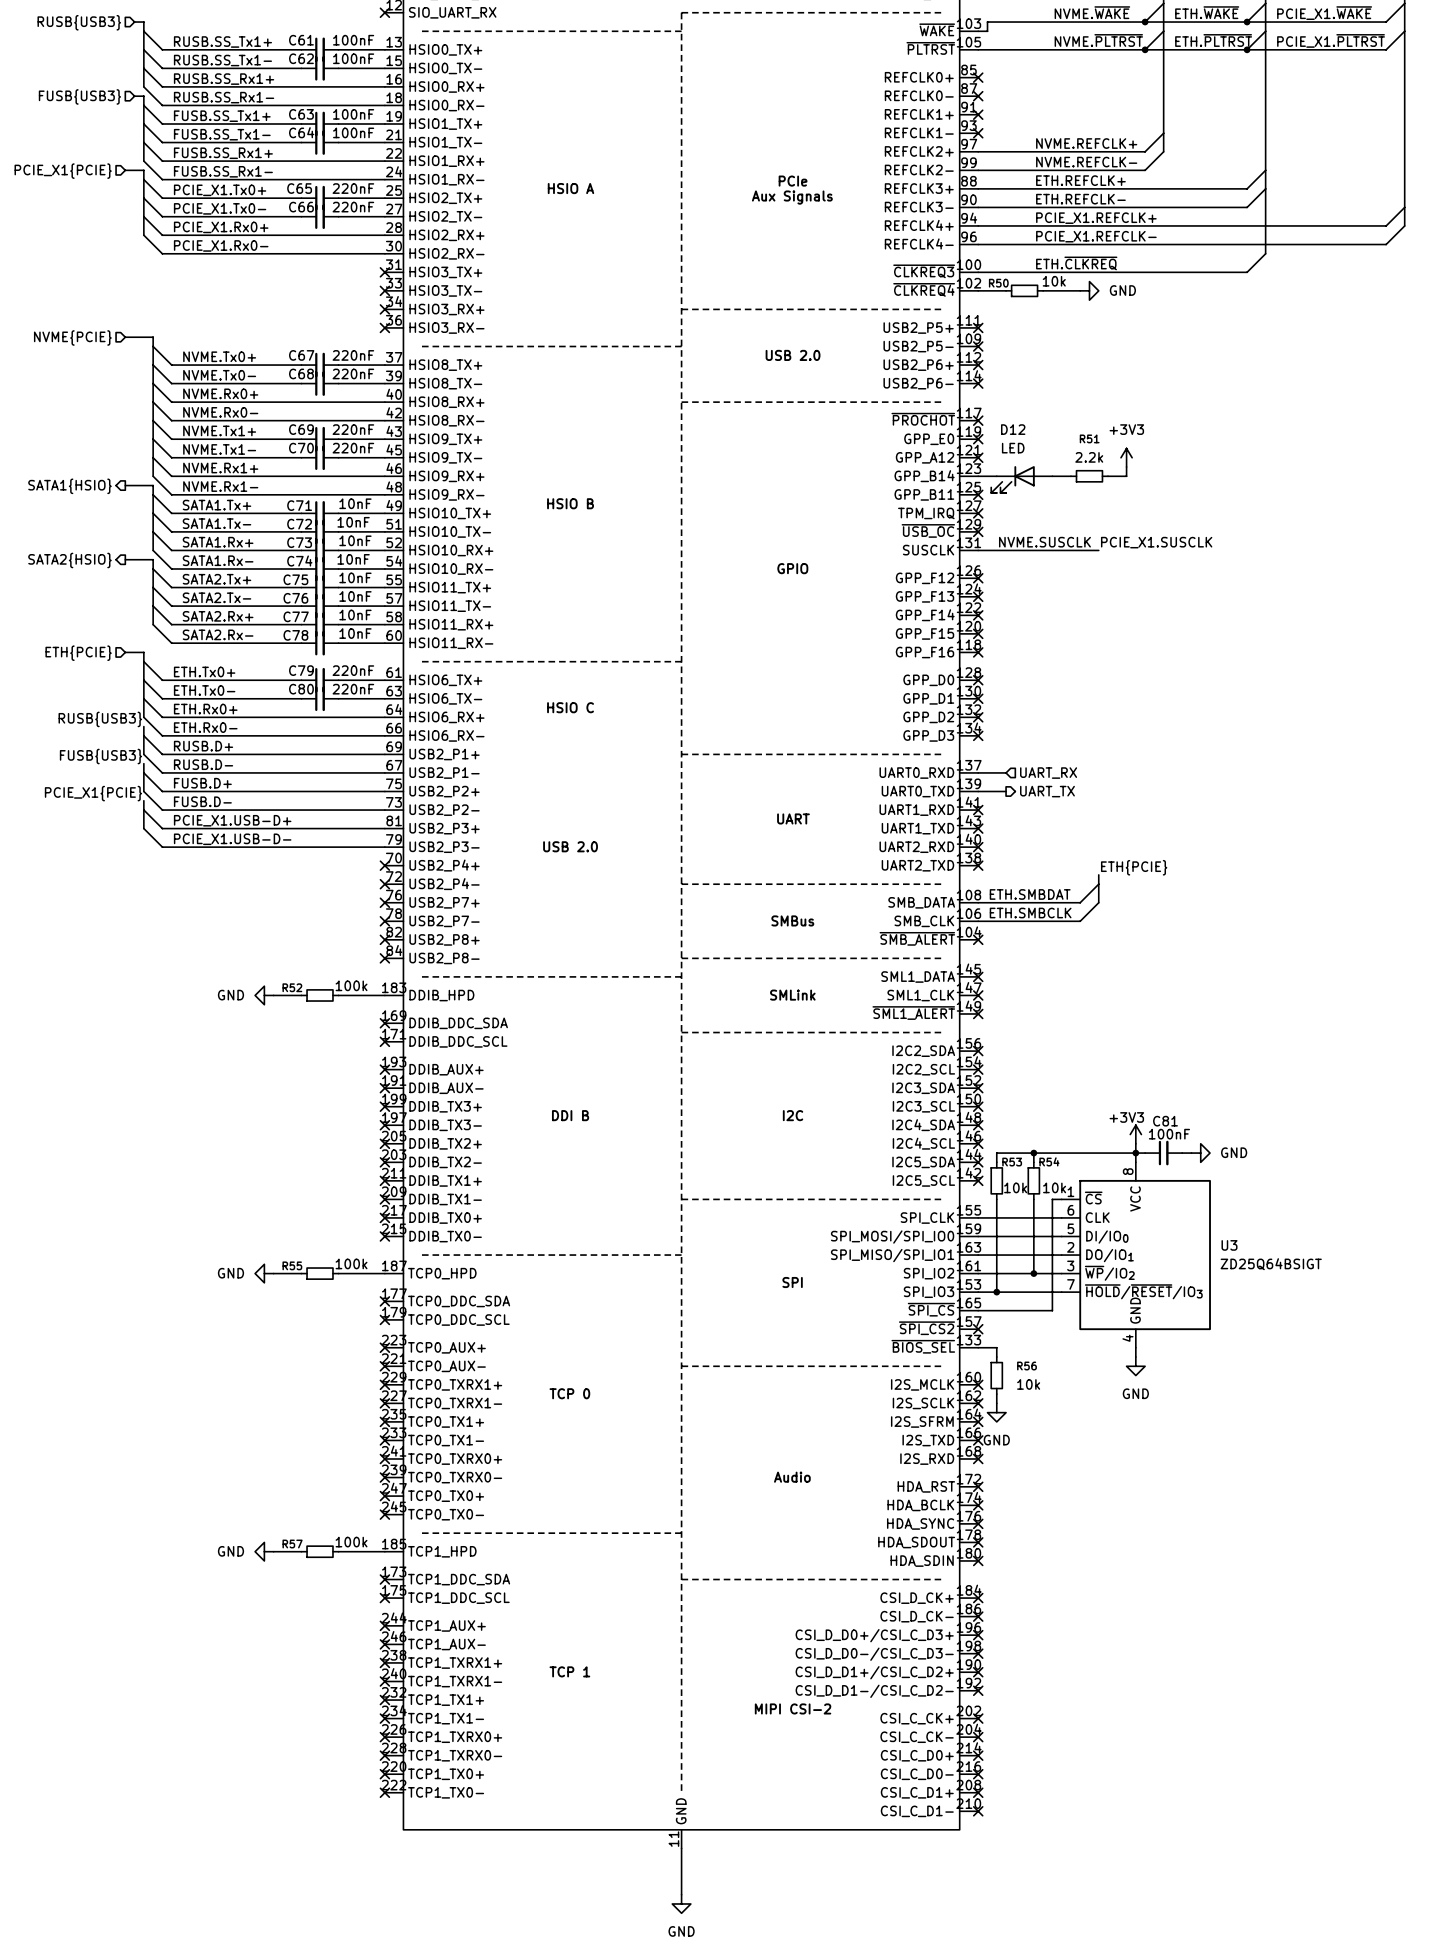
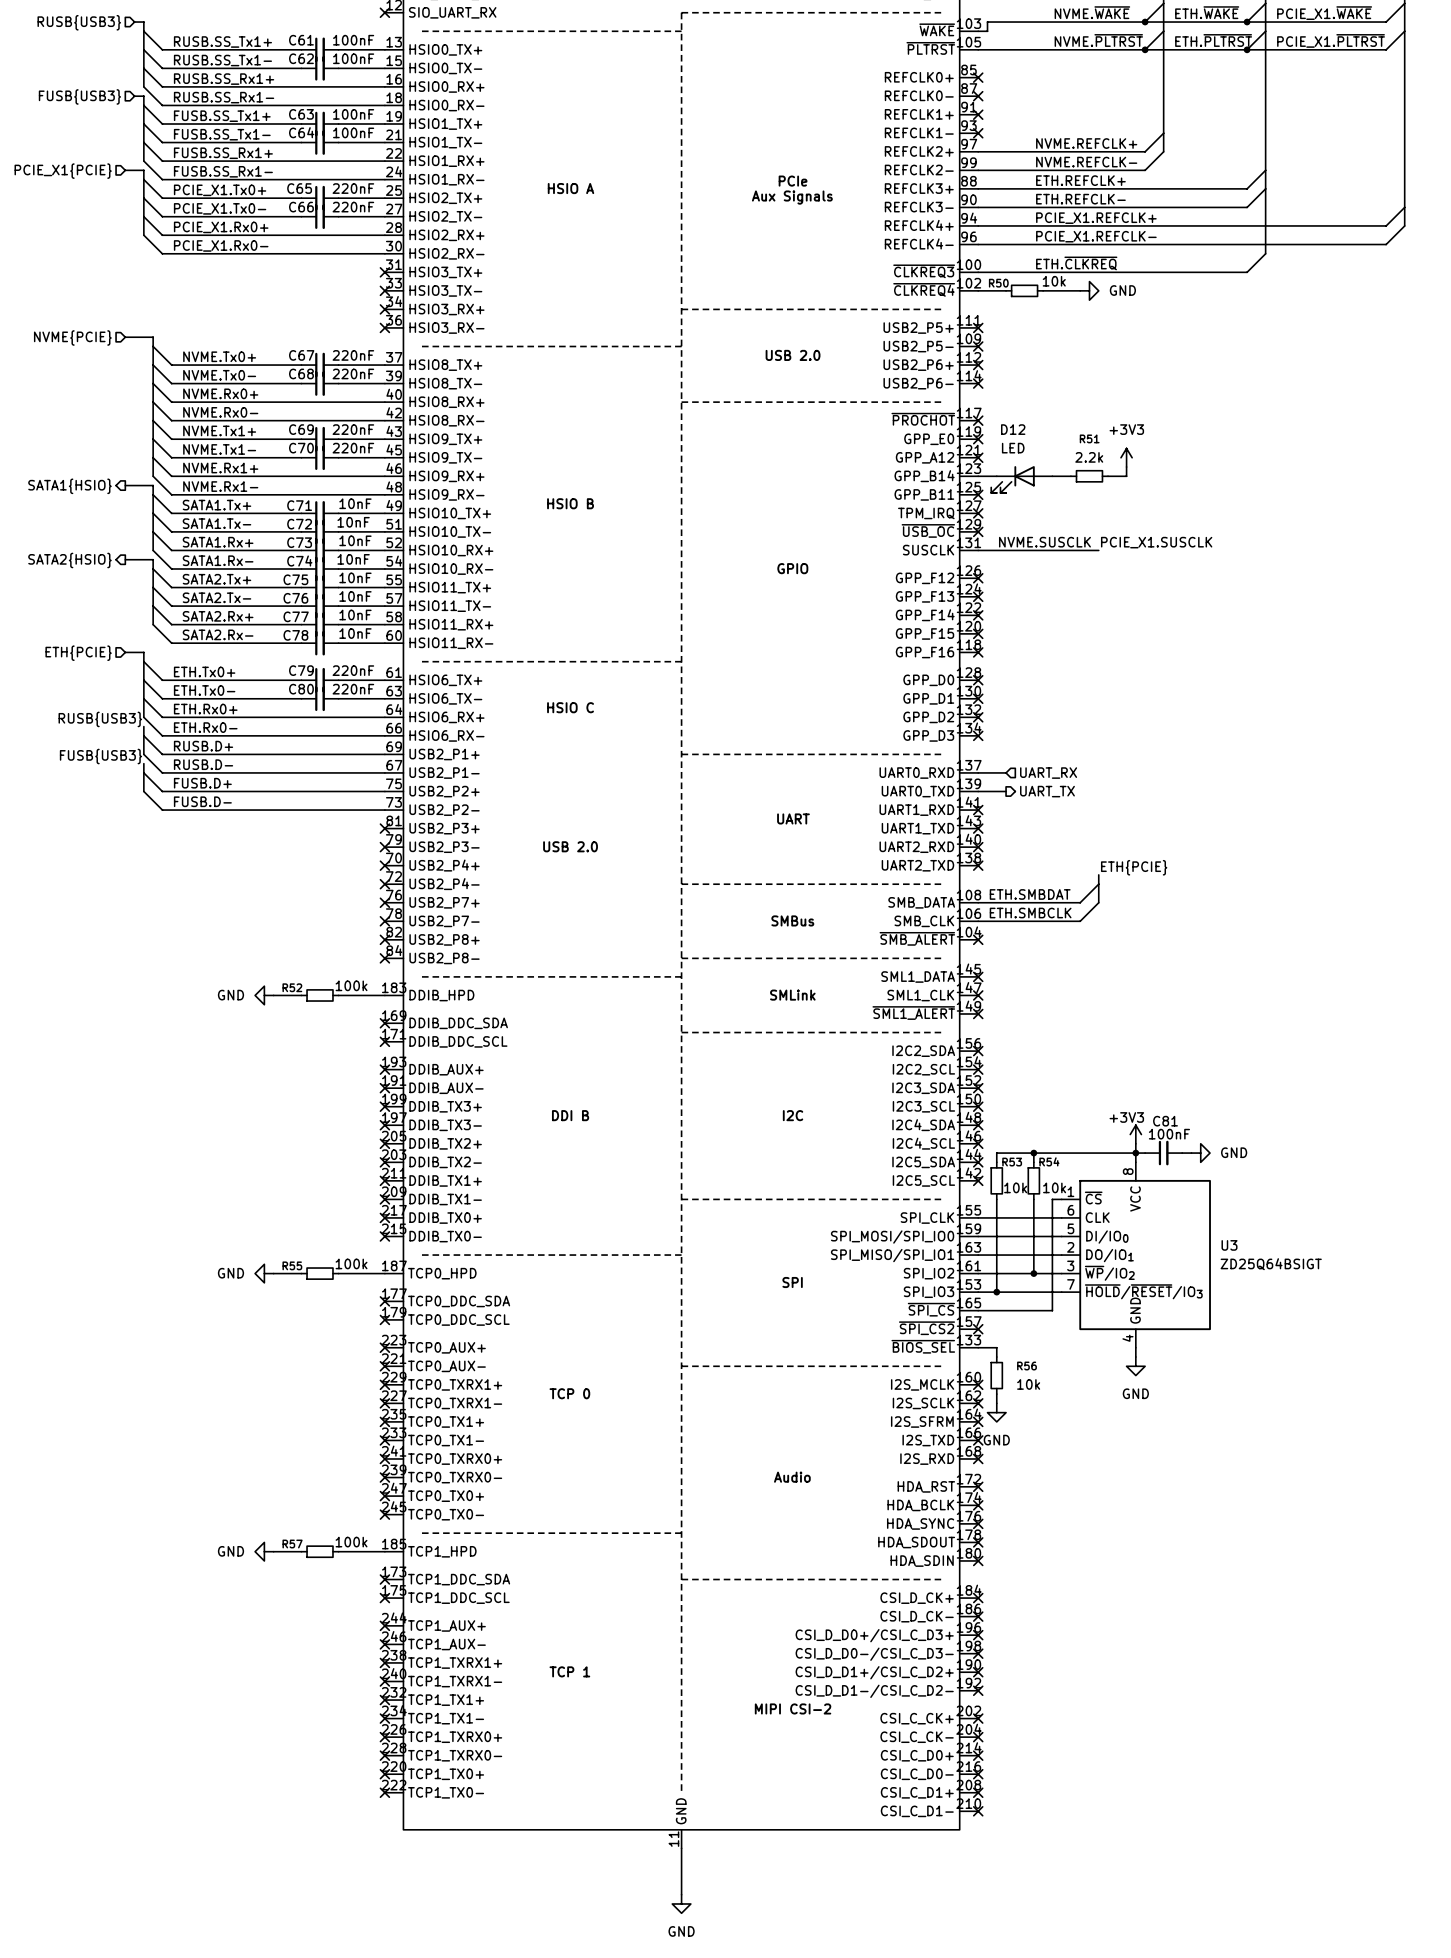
label: PCIE_X1{PCIE} (93, 793) -> none
bus: (143, 800) (143, 828) -> none
wire: (143, 810) (162, 828) (384, 828) -> none
label: PCIE_X1.USB-D+ (232, 820) -> none
wire: (143, 828) (162, 847) (384, 847) -> none
no-connect mark: none -> (384, 828)
label: PCIE_X1.USB-D- (232, 839) -> none
no-connect mark: none -> (384, 847)

